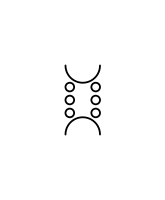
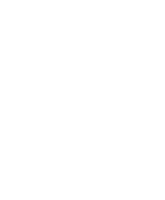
part: (82, 100) -> none

